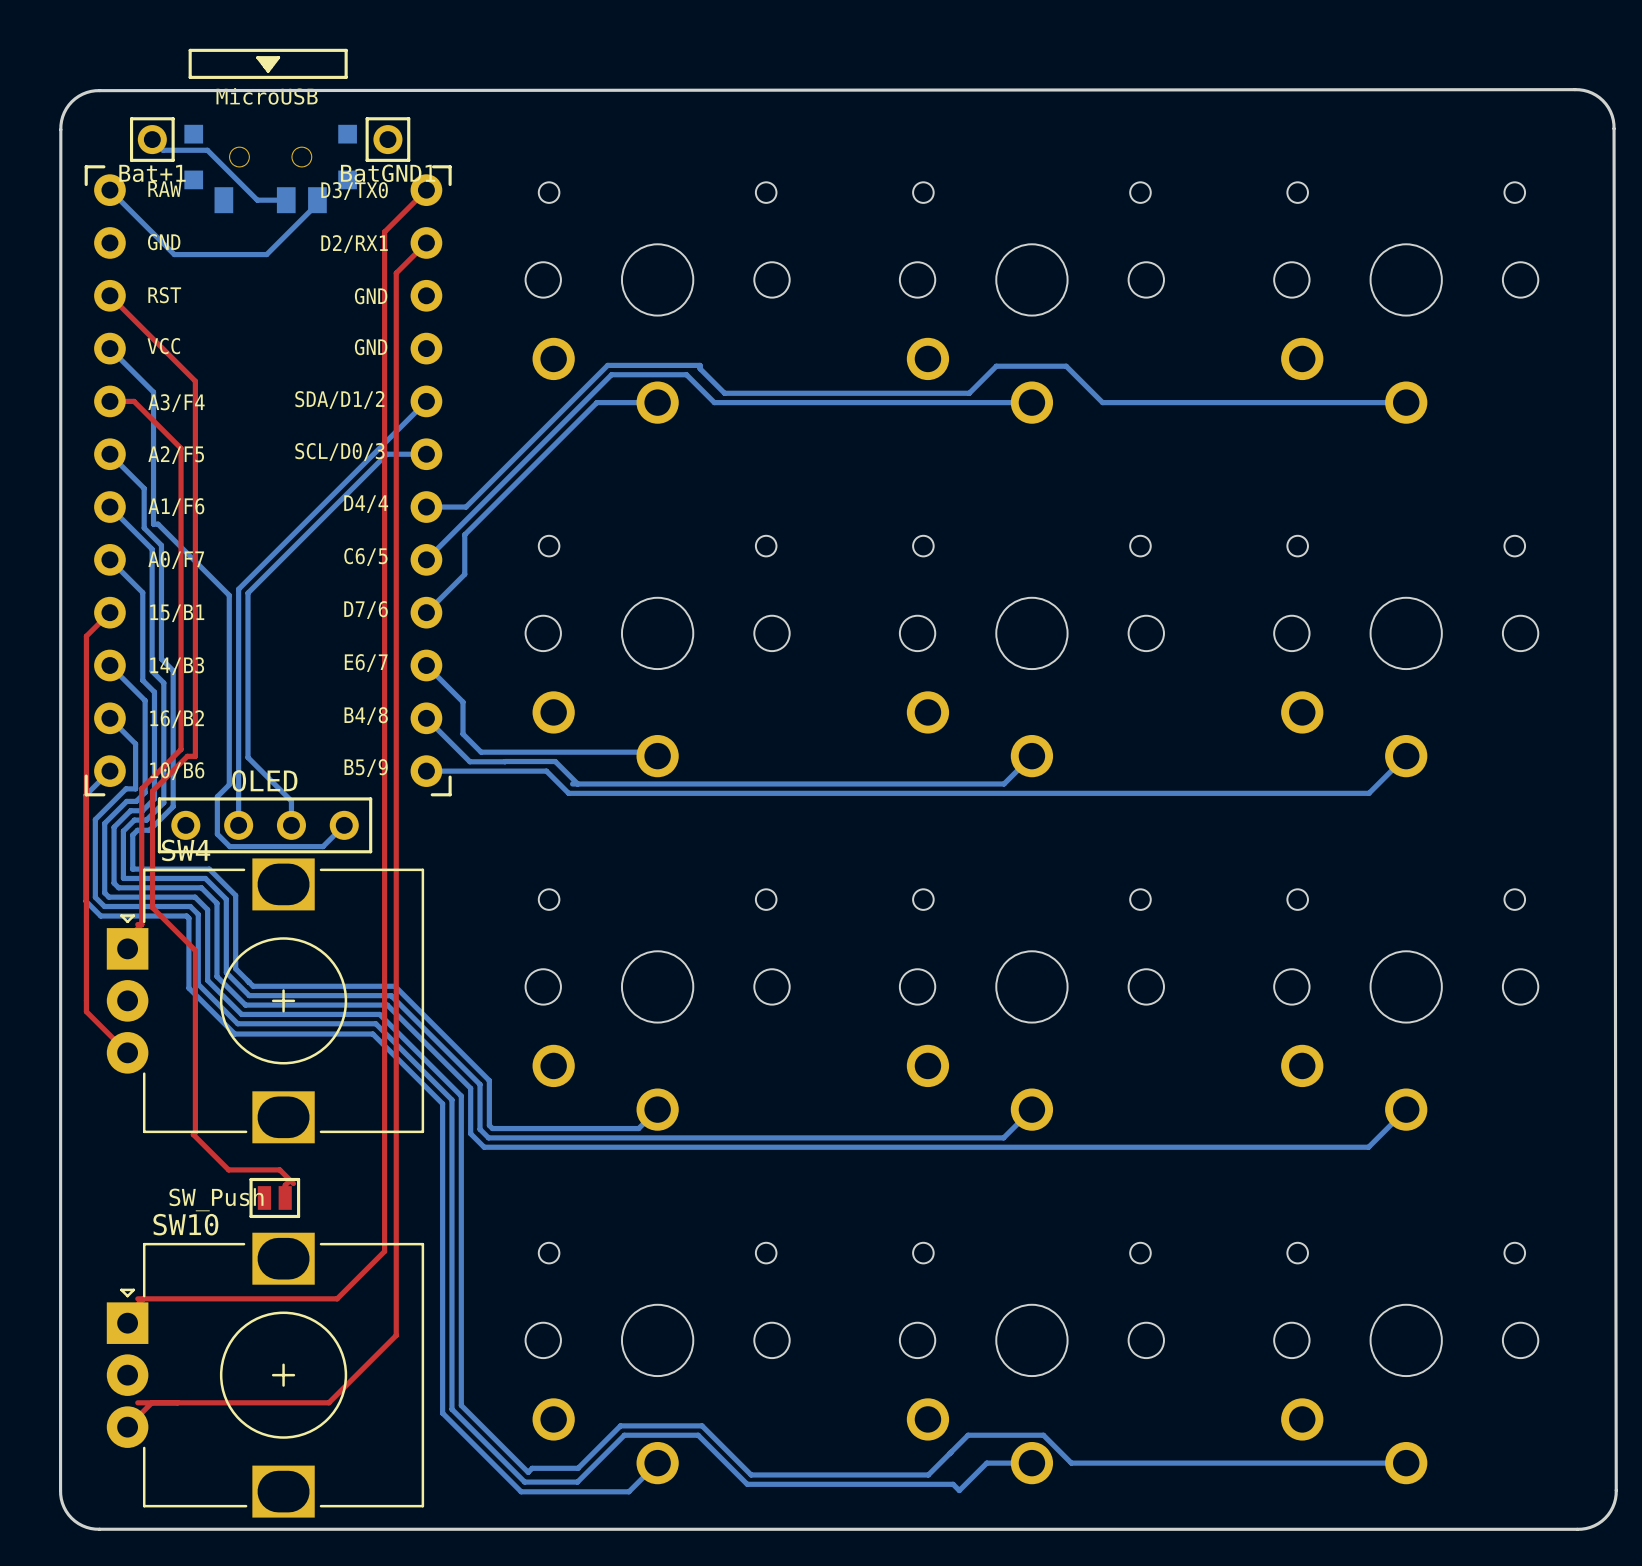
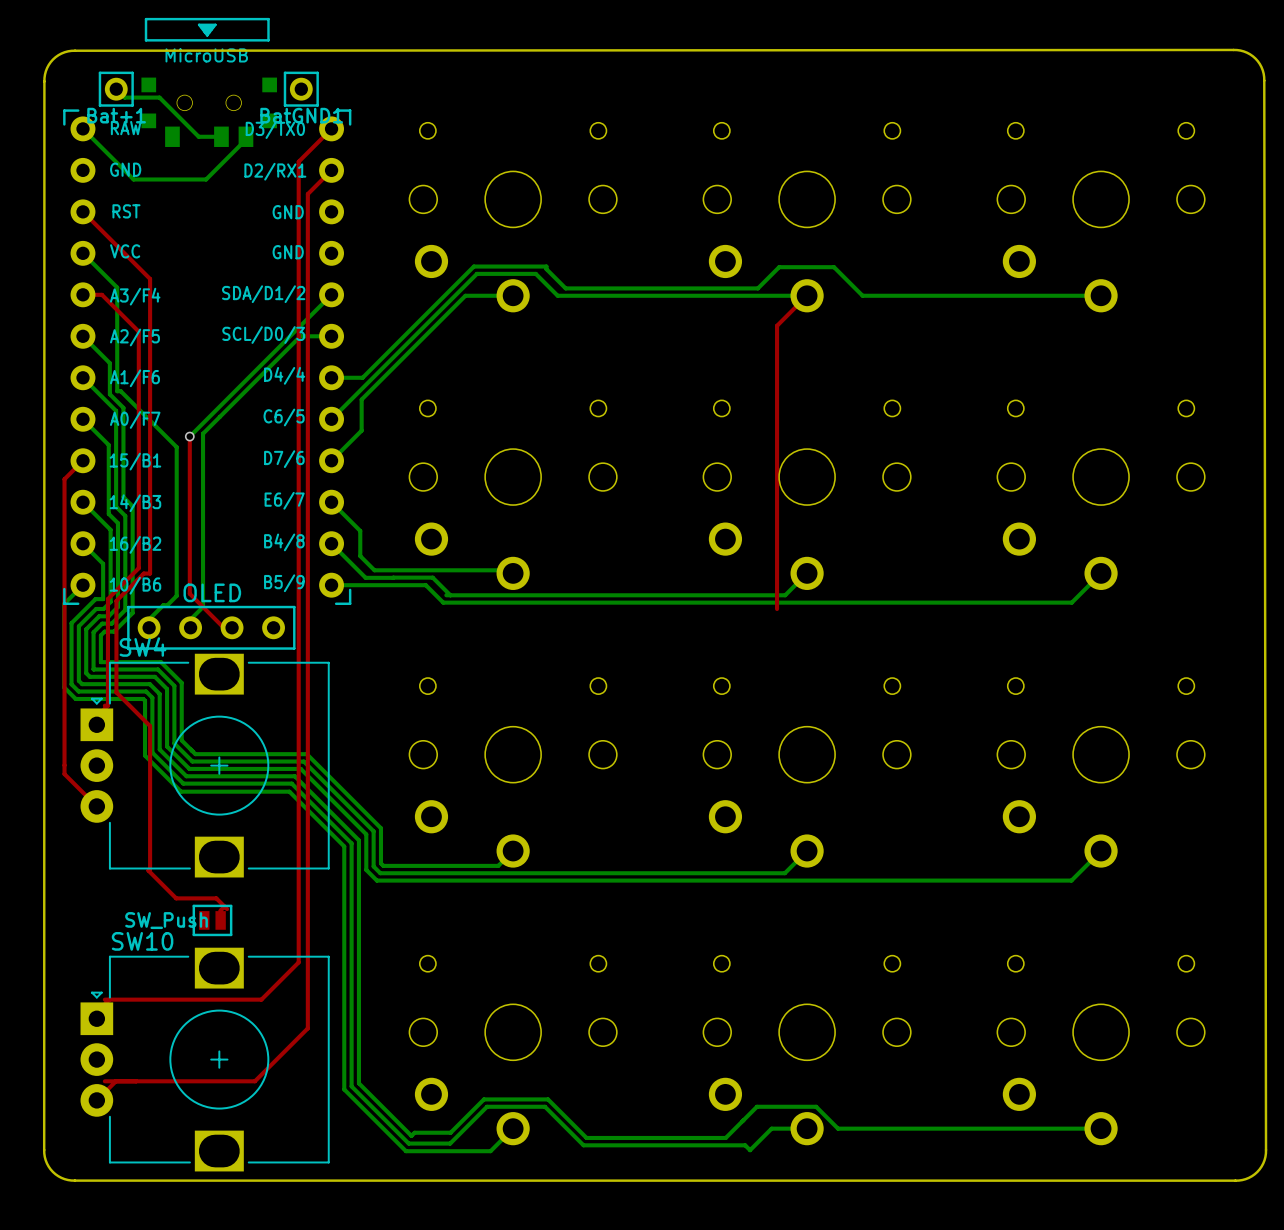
top track: none -> (807, 295) (777, 325) (777, 609)
bottom track: (262, 578) (247, 593) (247, 757) (291, 801) (291, 825) -> (203, 433) (203, 607) (182, 627)
top track: none -> (189, 436) (189, 593) (223, 627)
bottom track: (245, 581) (238, 589) (238, 825) -> none
via: none -> (189, 436)
bottom track: (217, 796) (217, 834) (229, 846) (323, 846) (344, 825) -> (167, 605) (163, 605) (140, 627)
part side: top (265, 825) -> bottom (211, 627)

